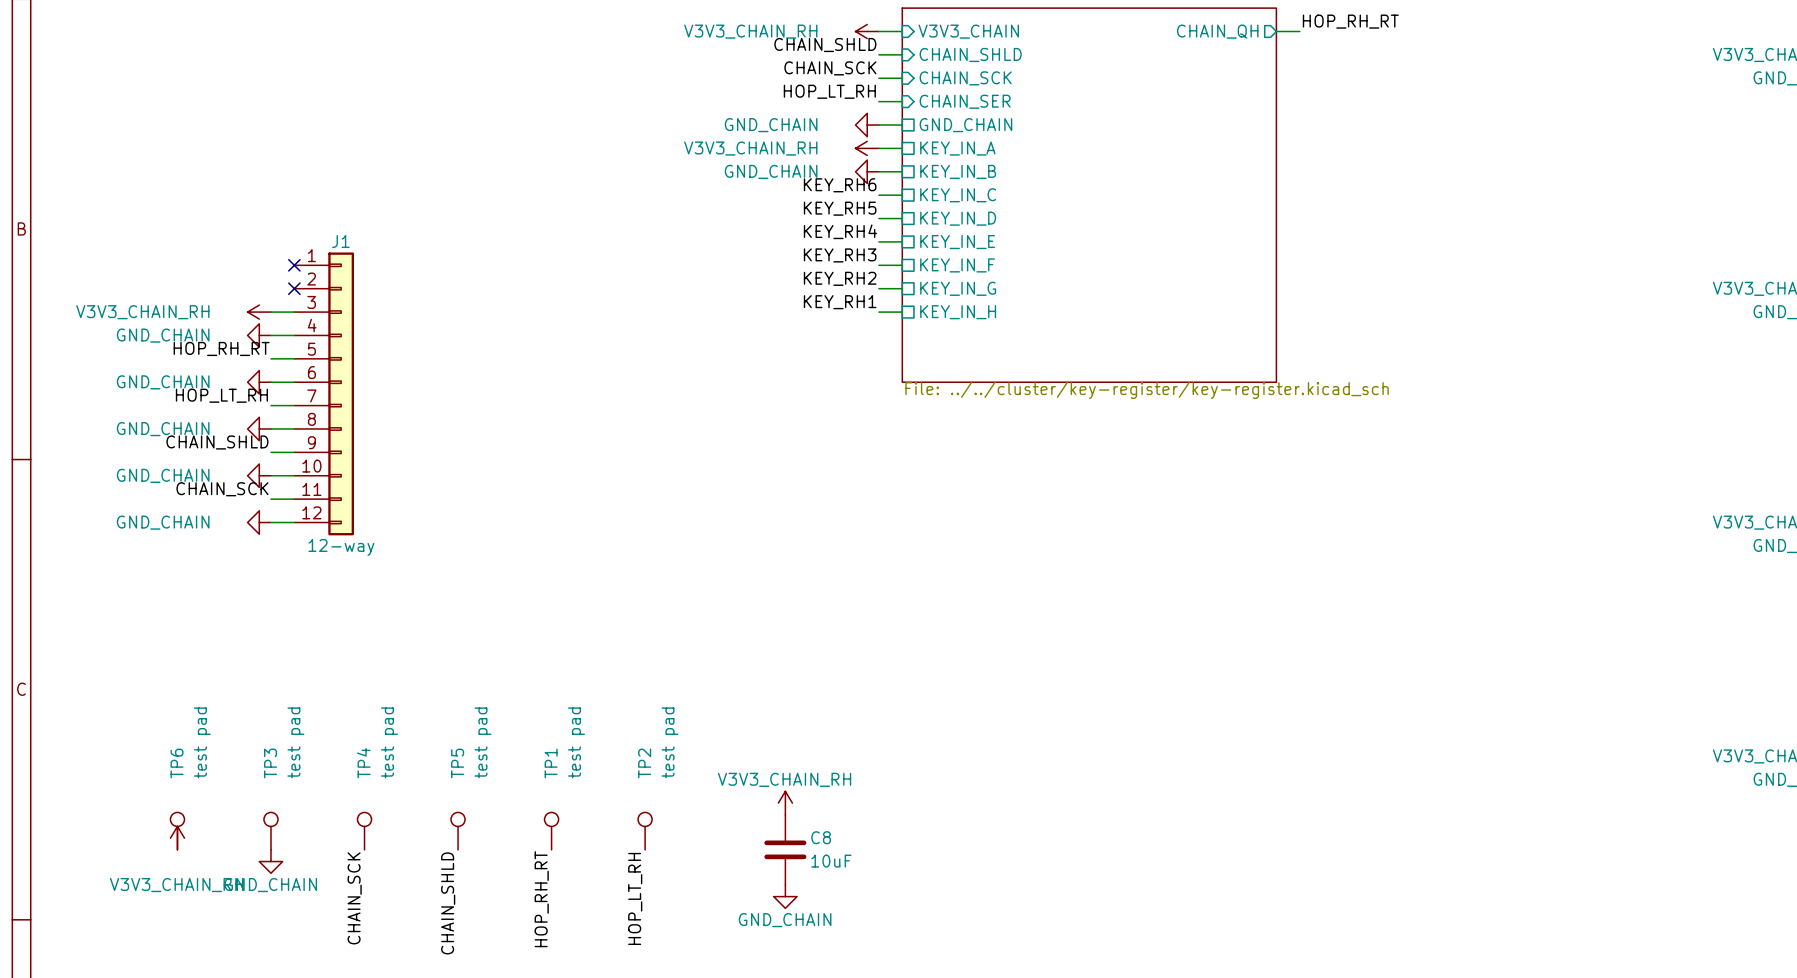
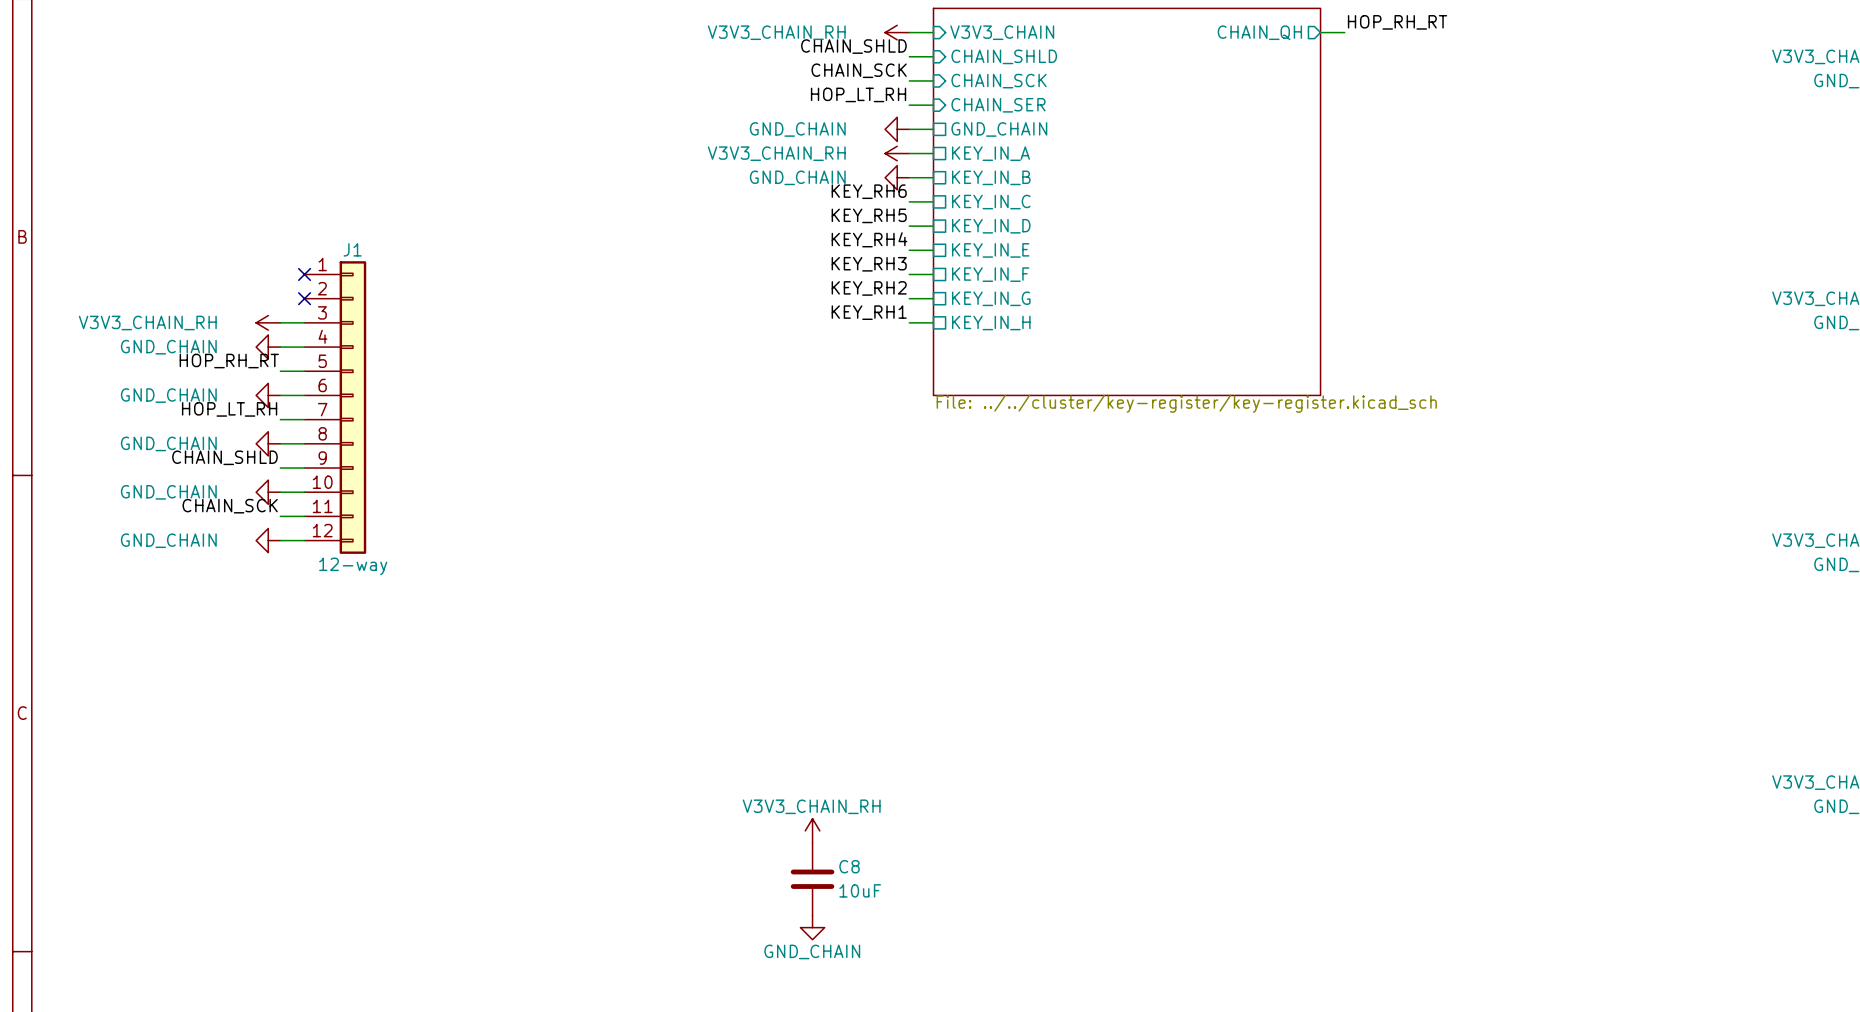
TP6: test pad (177, 831) -> none
TP3: test pad (270, 831) -> none
TP4: test pad (364, 831) -> none
TP5: test pad (458, 831) -> none
TP1: test pad (551, 831) -> none
TP2: test pad (645, 831) -> none
power symbol: V3V3_CHAIN_RH (177, 838) -> none
power symbol: GND_CHAIN (270, 861) -> none
label: CHAIN_SCK (354, 898) -> none
label: HOP_LT_RH (635, 898) -> none
label: HOP_RH_RT (541, 899) -> none
label: CHAIN_SHLD (448, 903) -> none

